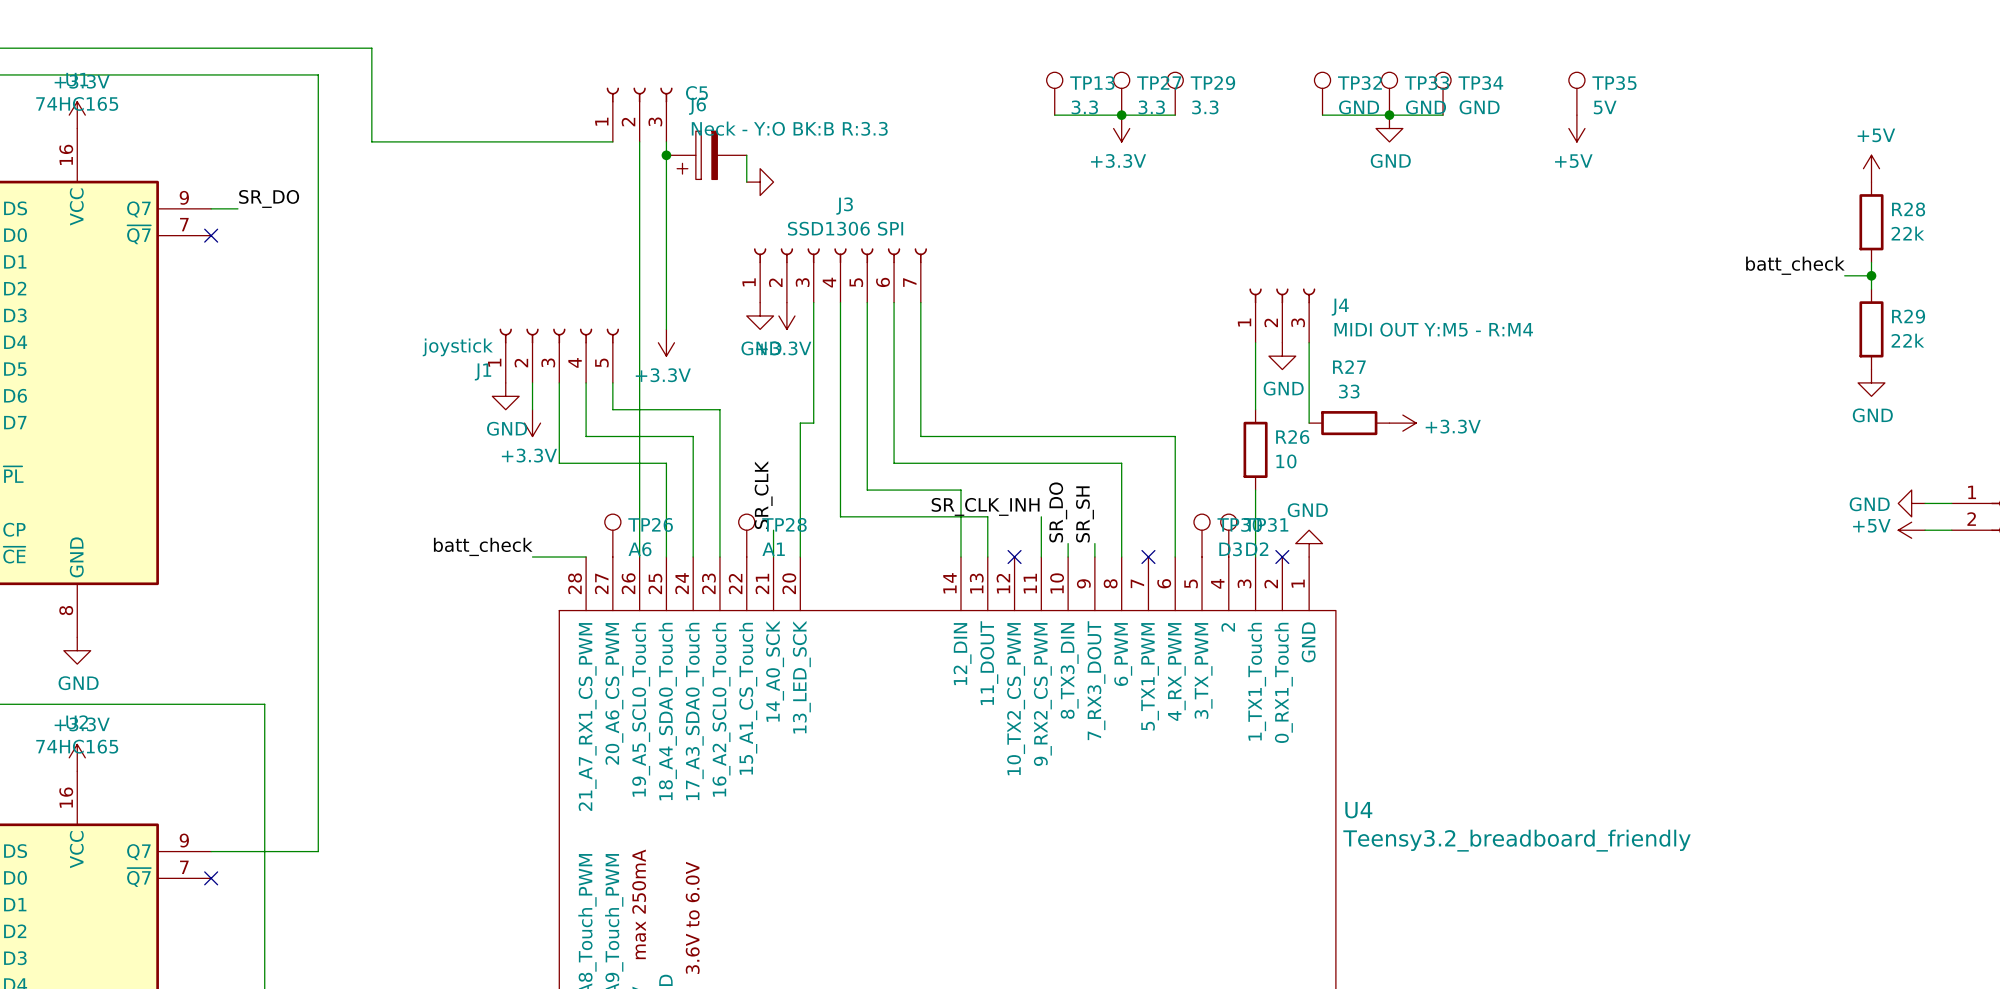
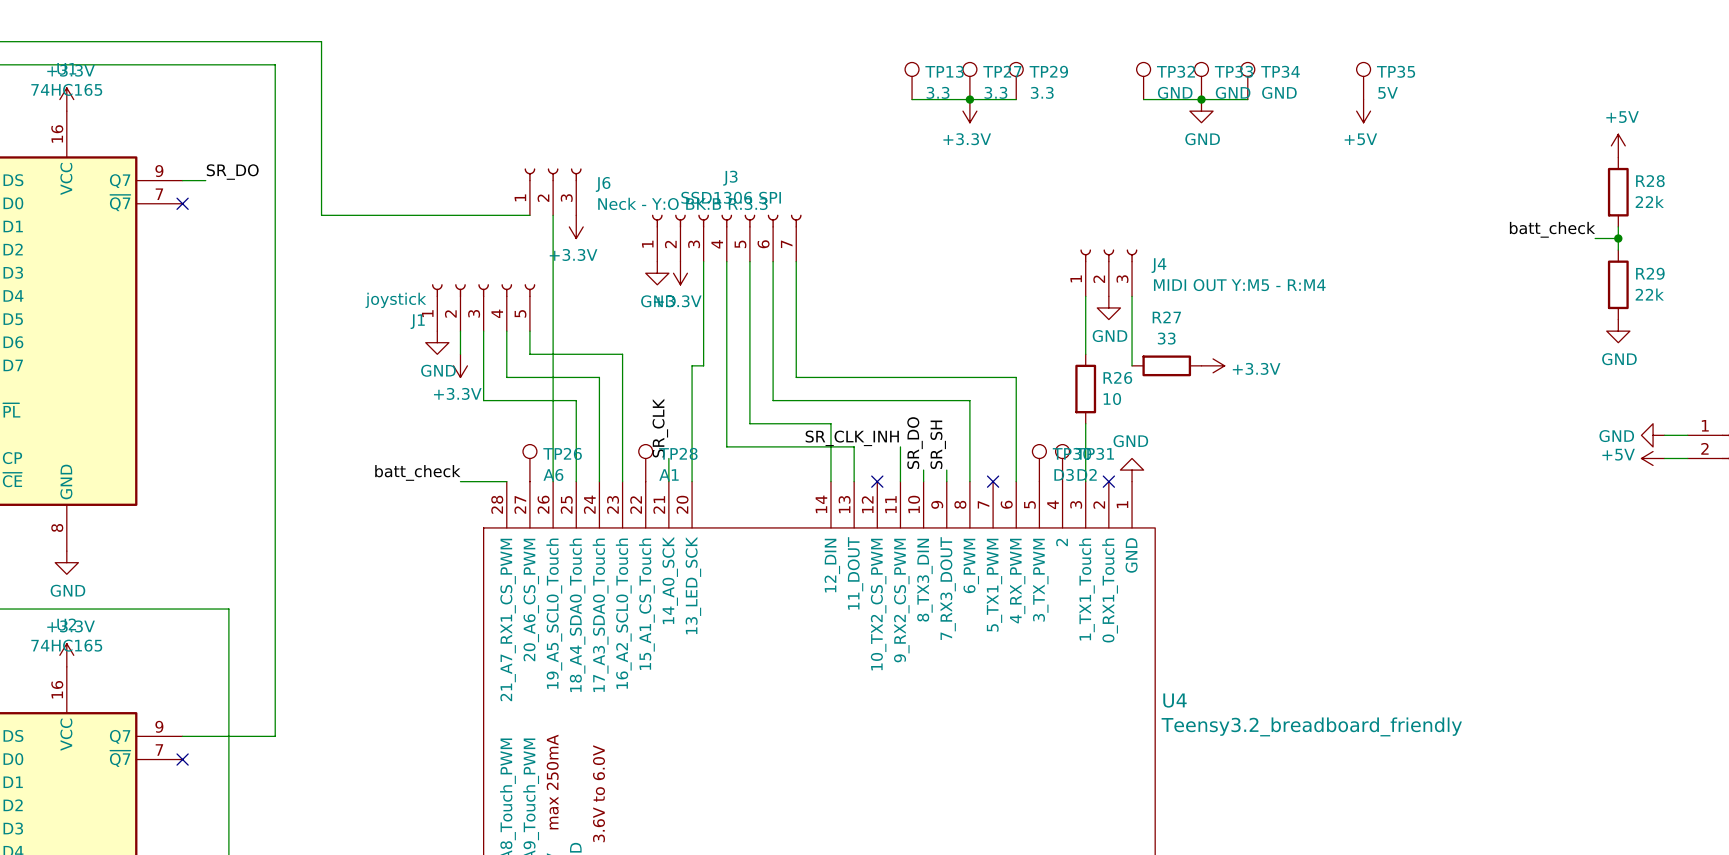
J6 position: (639, 114) -> (553, 191)
wire: (371, 141) (612, 141) -> (321, 122) (321, 215) (529, 215)
wire: (639, 141) (639, 249) -> none
wire: (666, 141) (666, 329) -> none
junction: (666, 155) -> none
C5: (706, 155) -> none
wire: (746, 155) (746, 182) -> none
power symbol: (760, 182) -> none
power symbol position: +3.3V (666, 342) -> +3.3V (576, 226)

